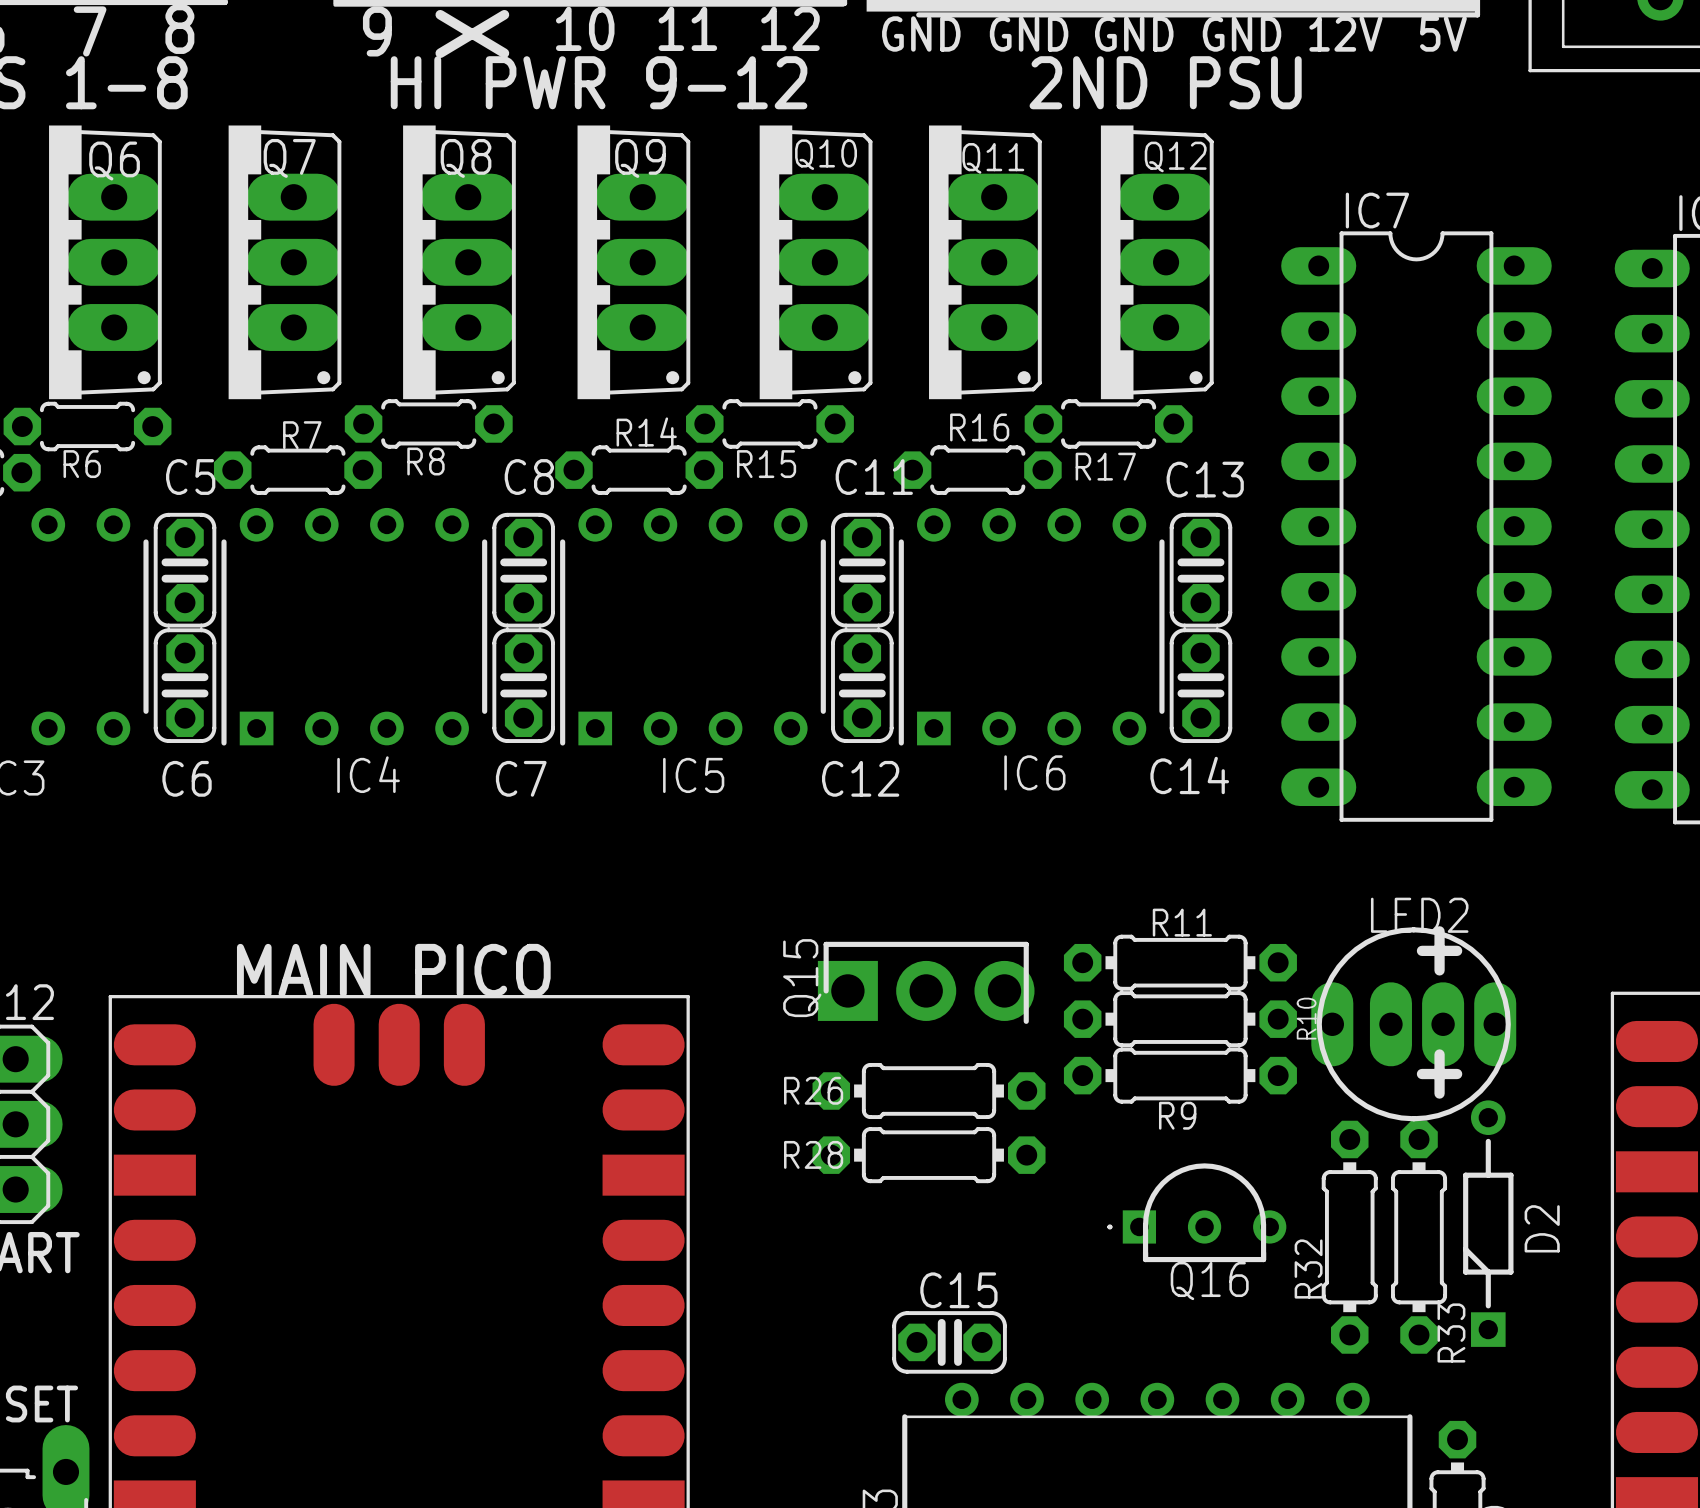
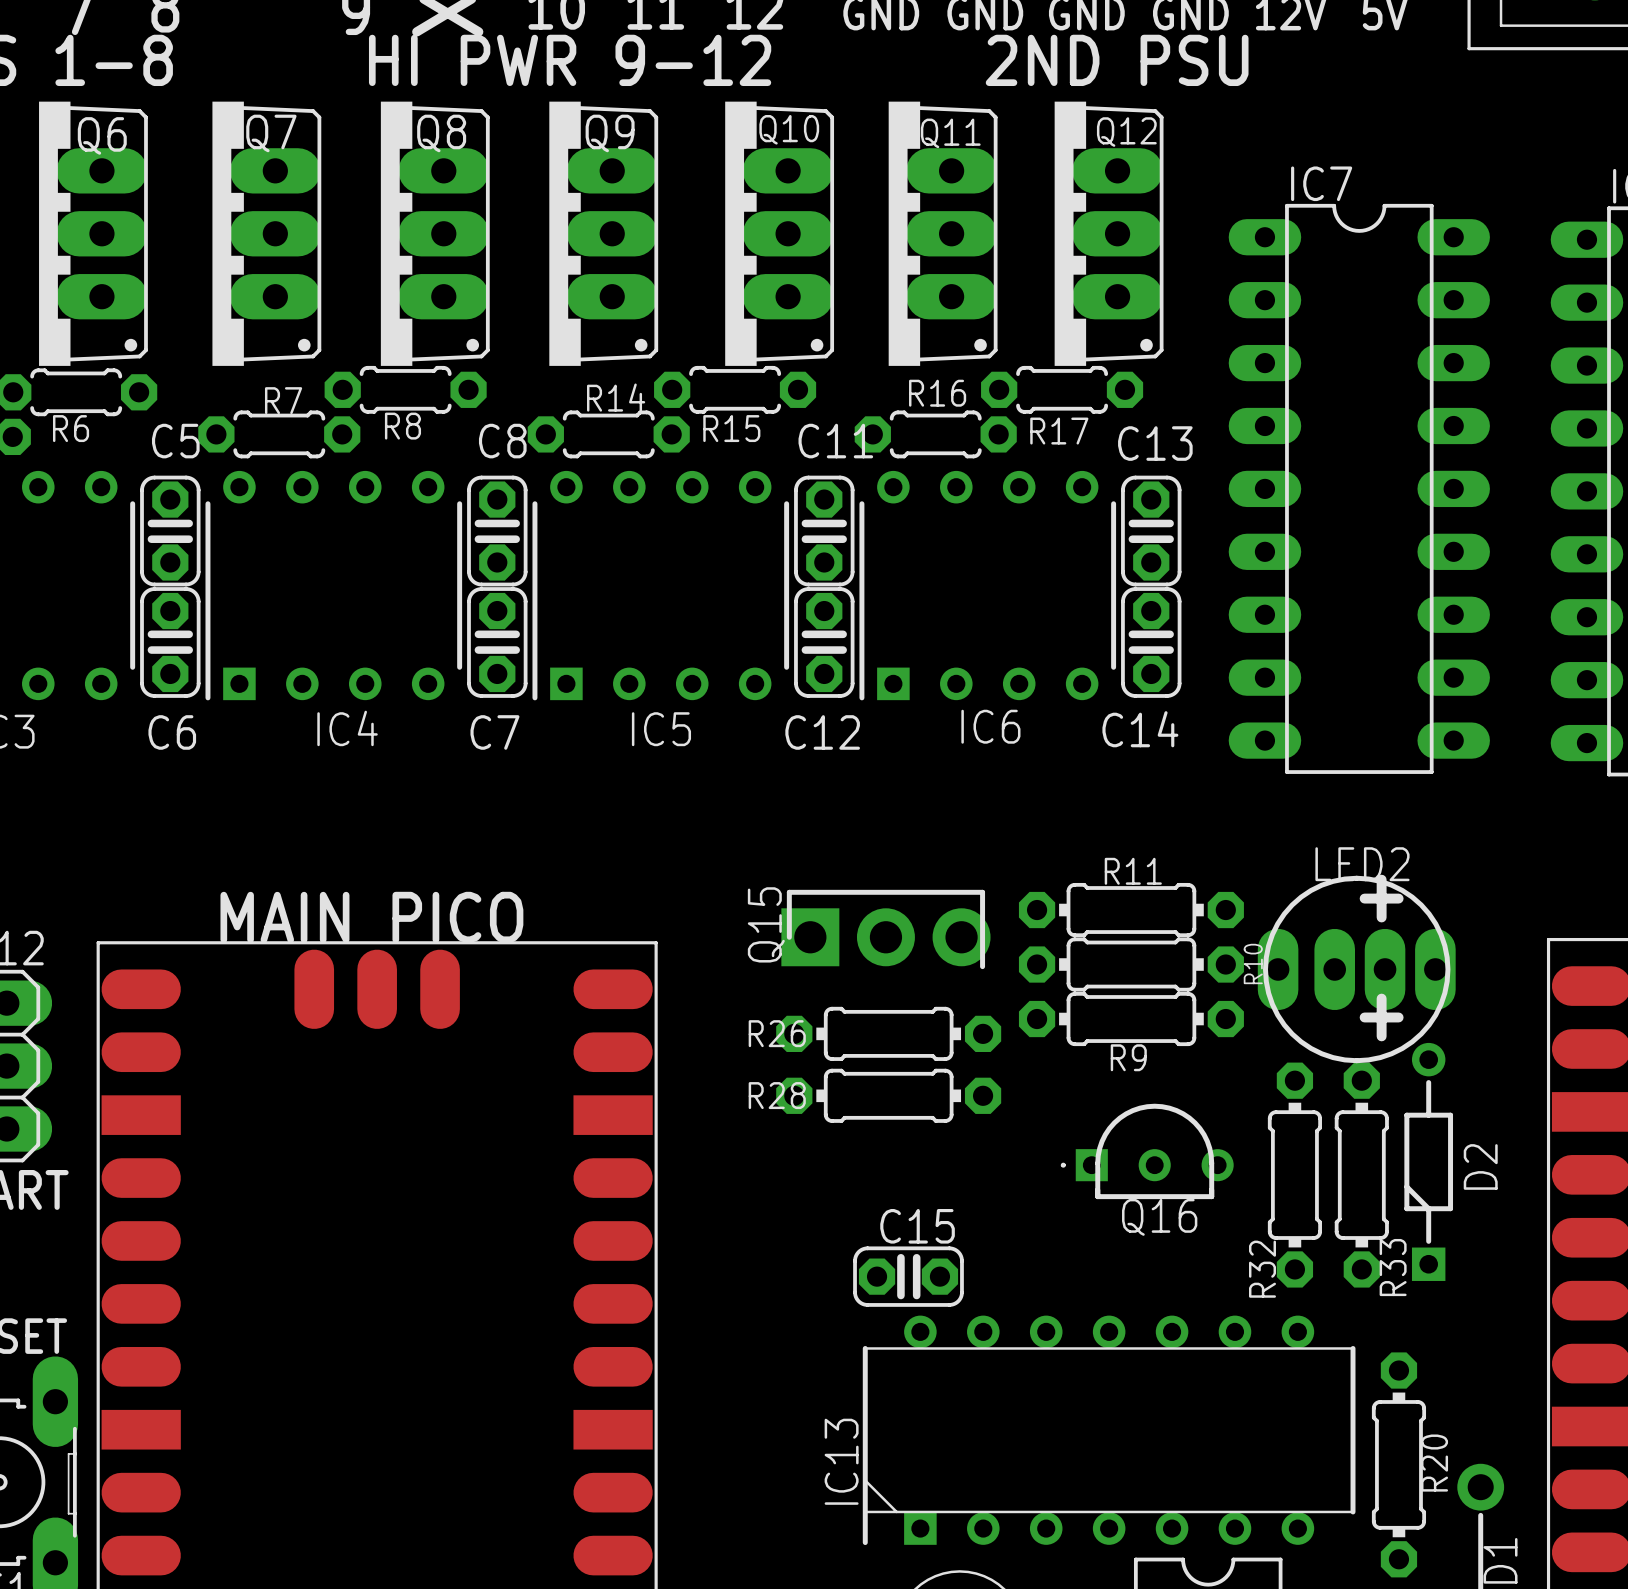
R32 name position: R32 (1308, 1269) -> R32 (1262, 1269)

